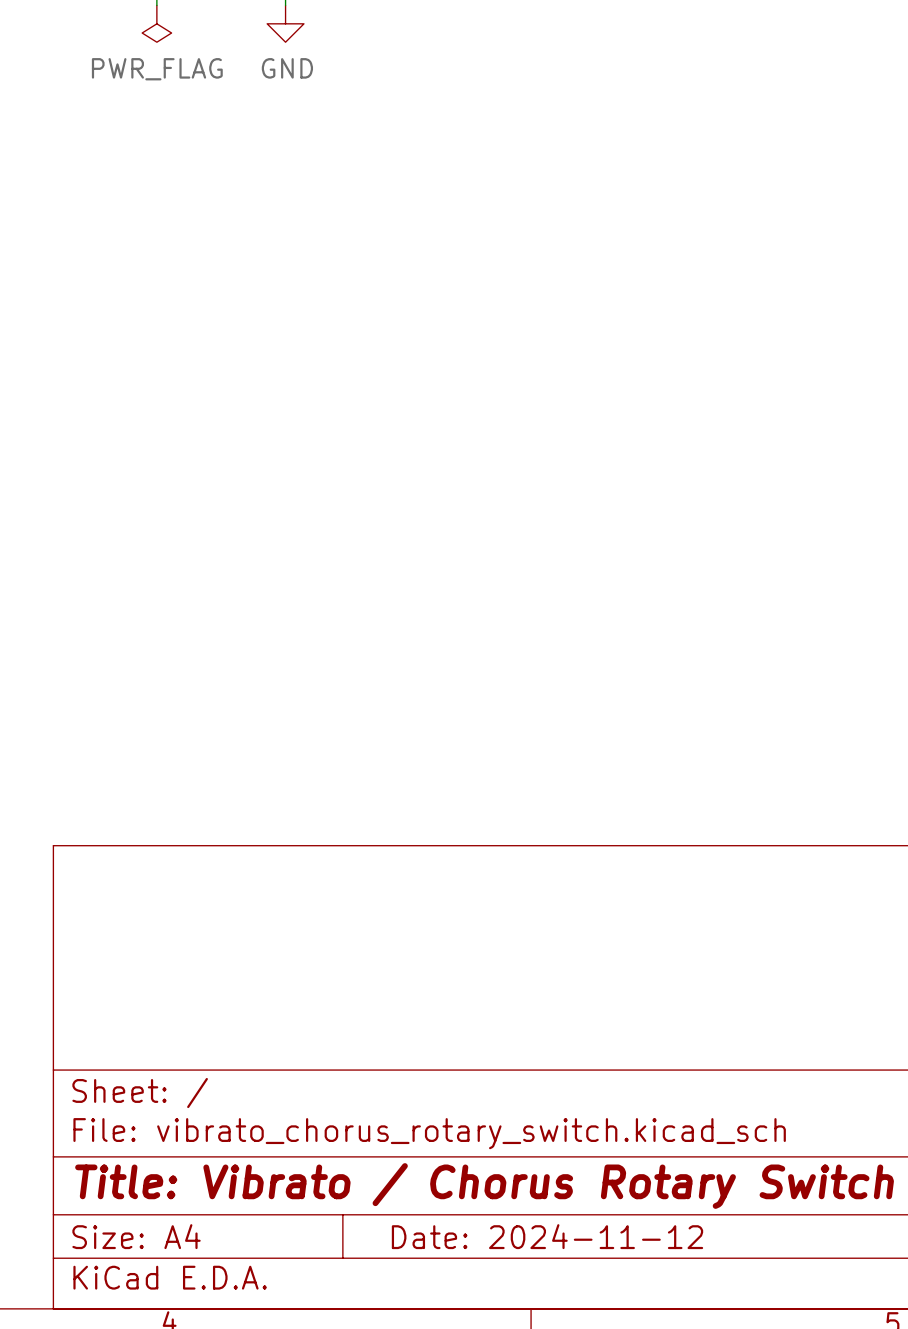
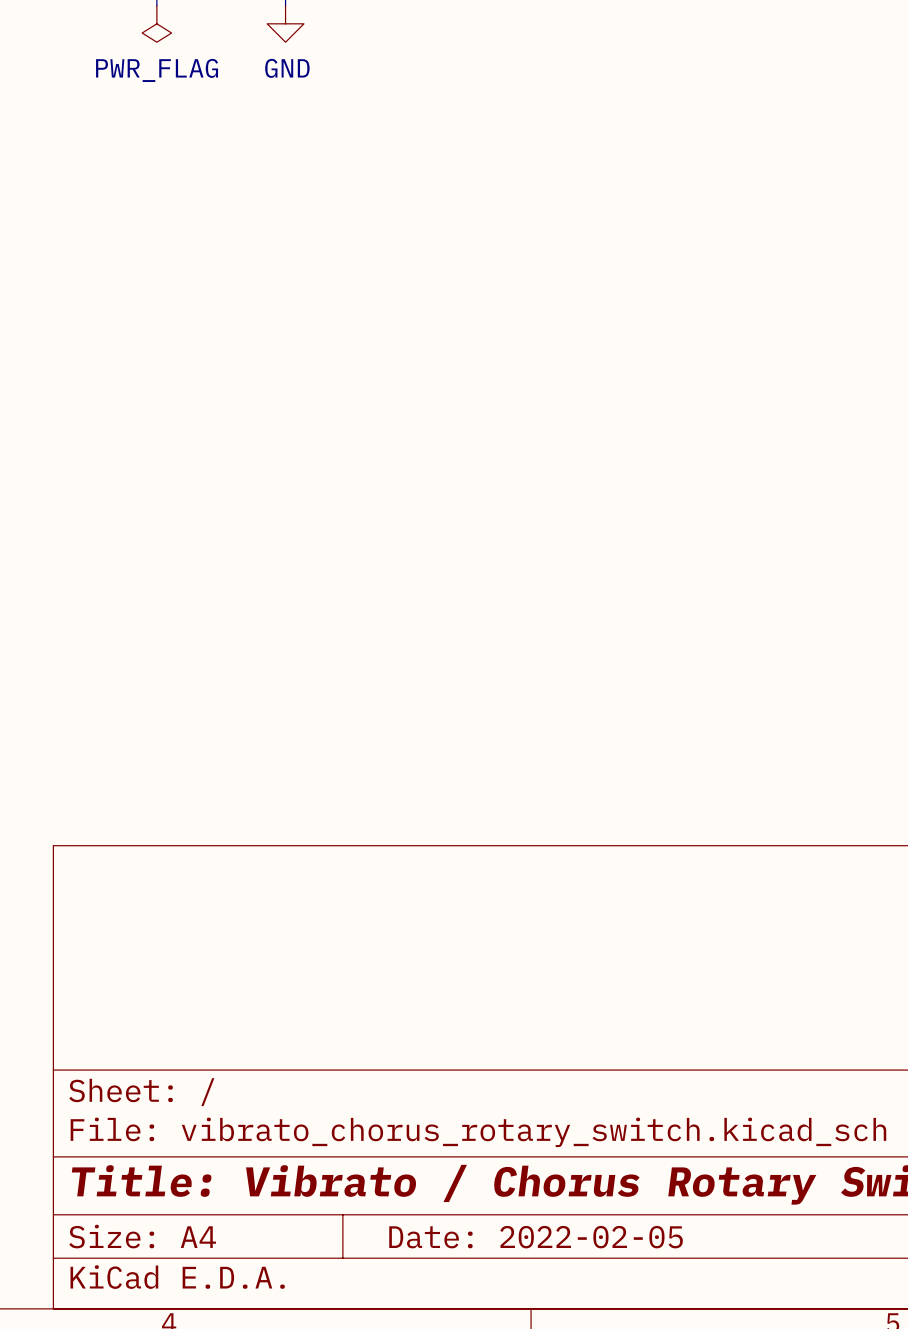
title block: Date: 2024-11-12 (547, 1236) -> Date: 2022-02-05 (536, 1237)

